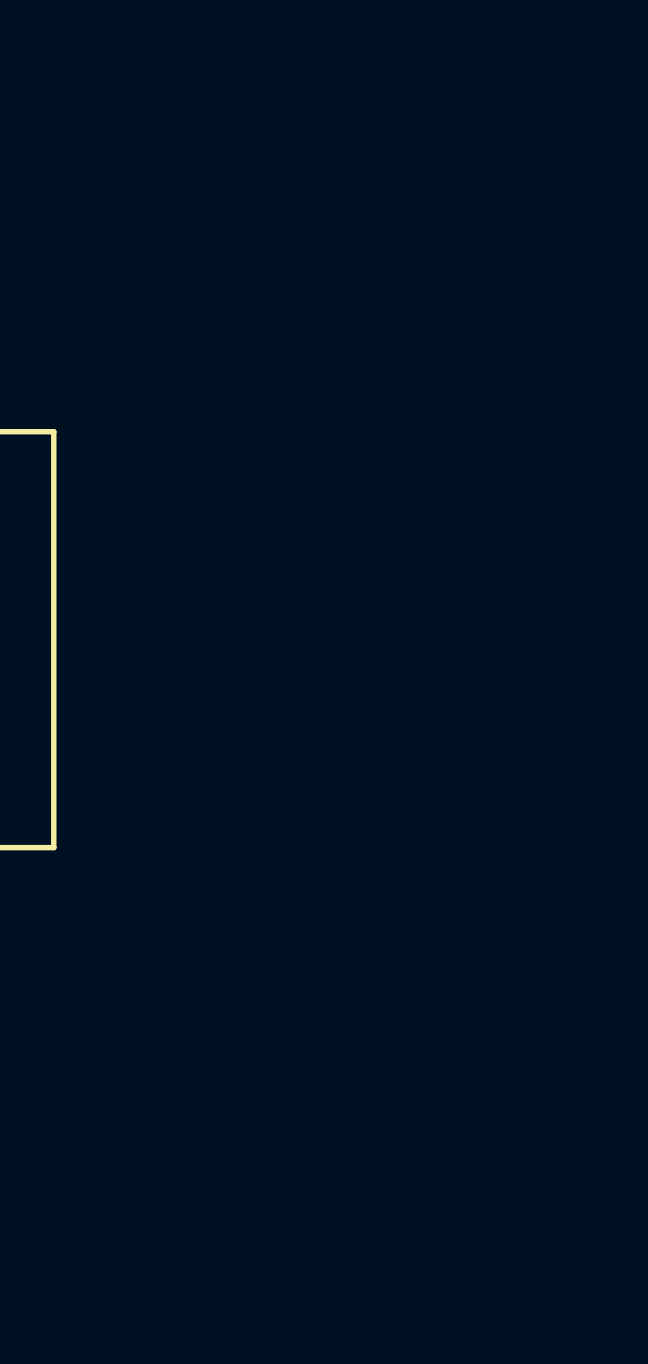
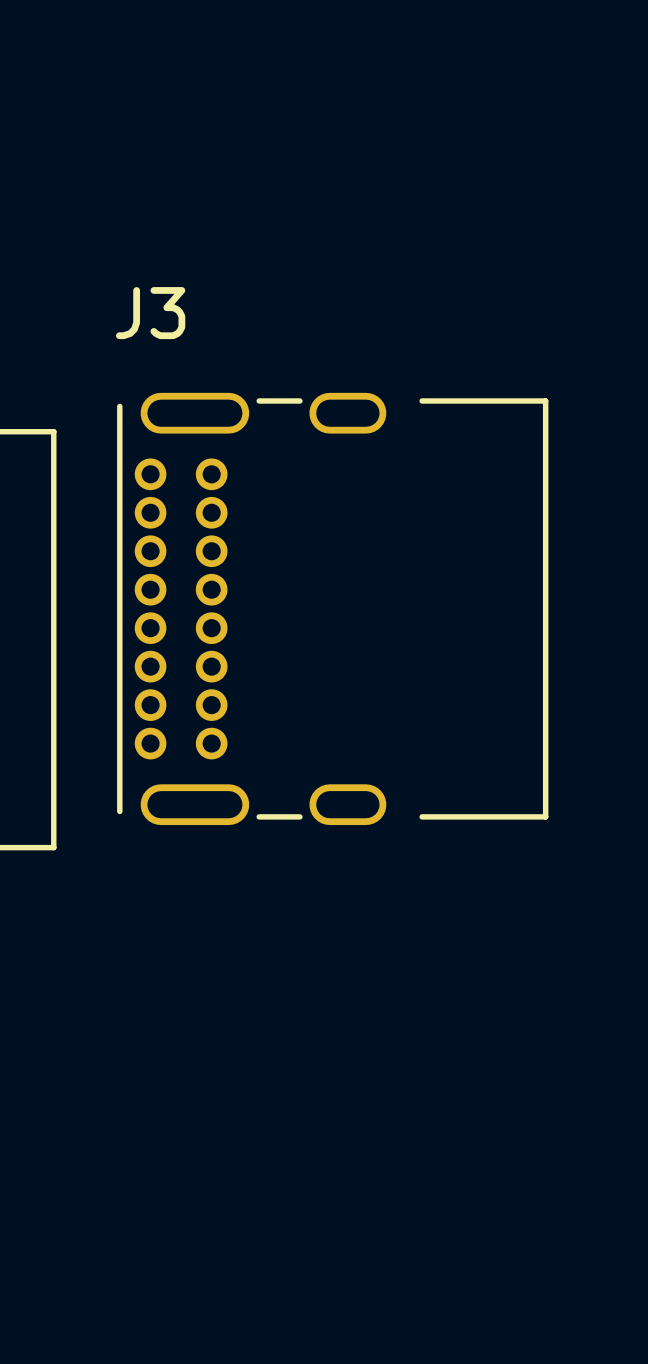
J3: none -> (332, 608)

